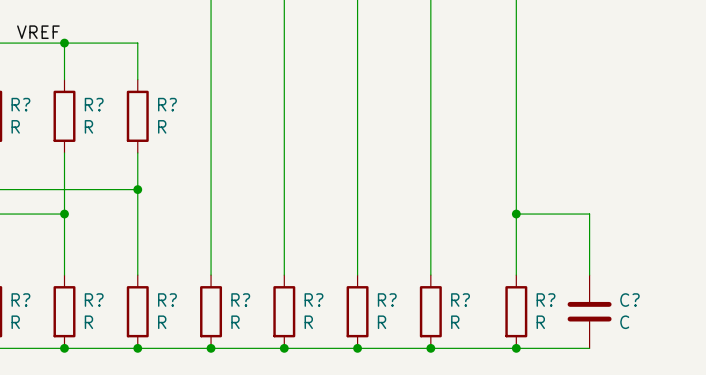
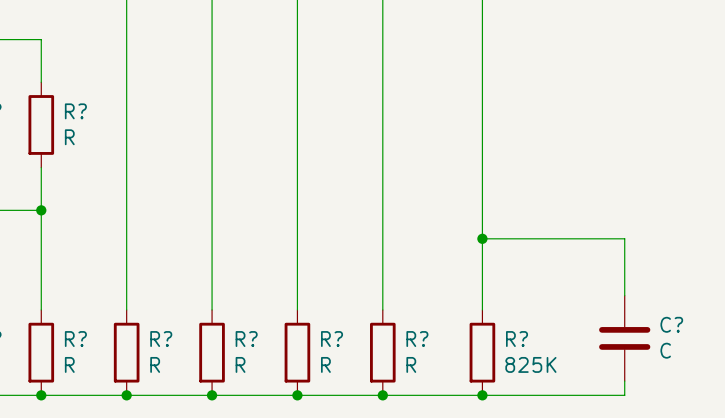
wire: (589, 214) (589, 275) -> (567, 238) (624, 238) (624, 295)
C? position: (589, 311) -> (624, 338)
R? value: R (540, 322) -> none
R? text: none -> 825K (530, 364)
wire: none -> (624, 381) (624, 395) (567, 395)

